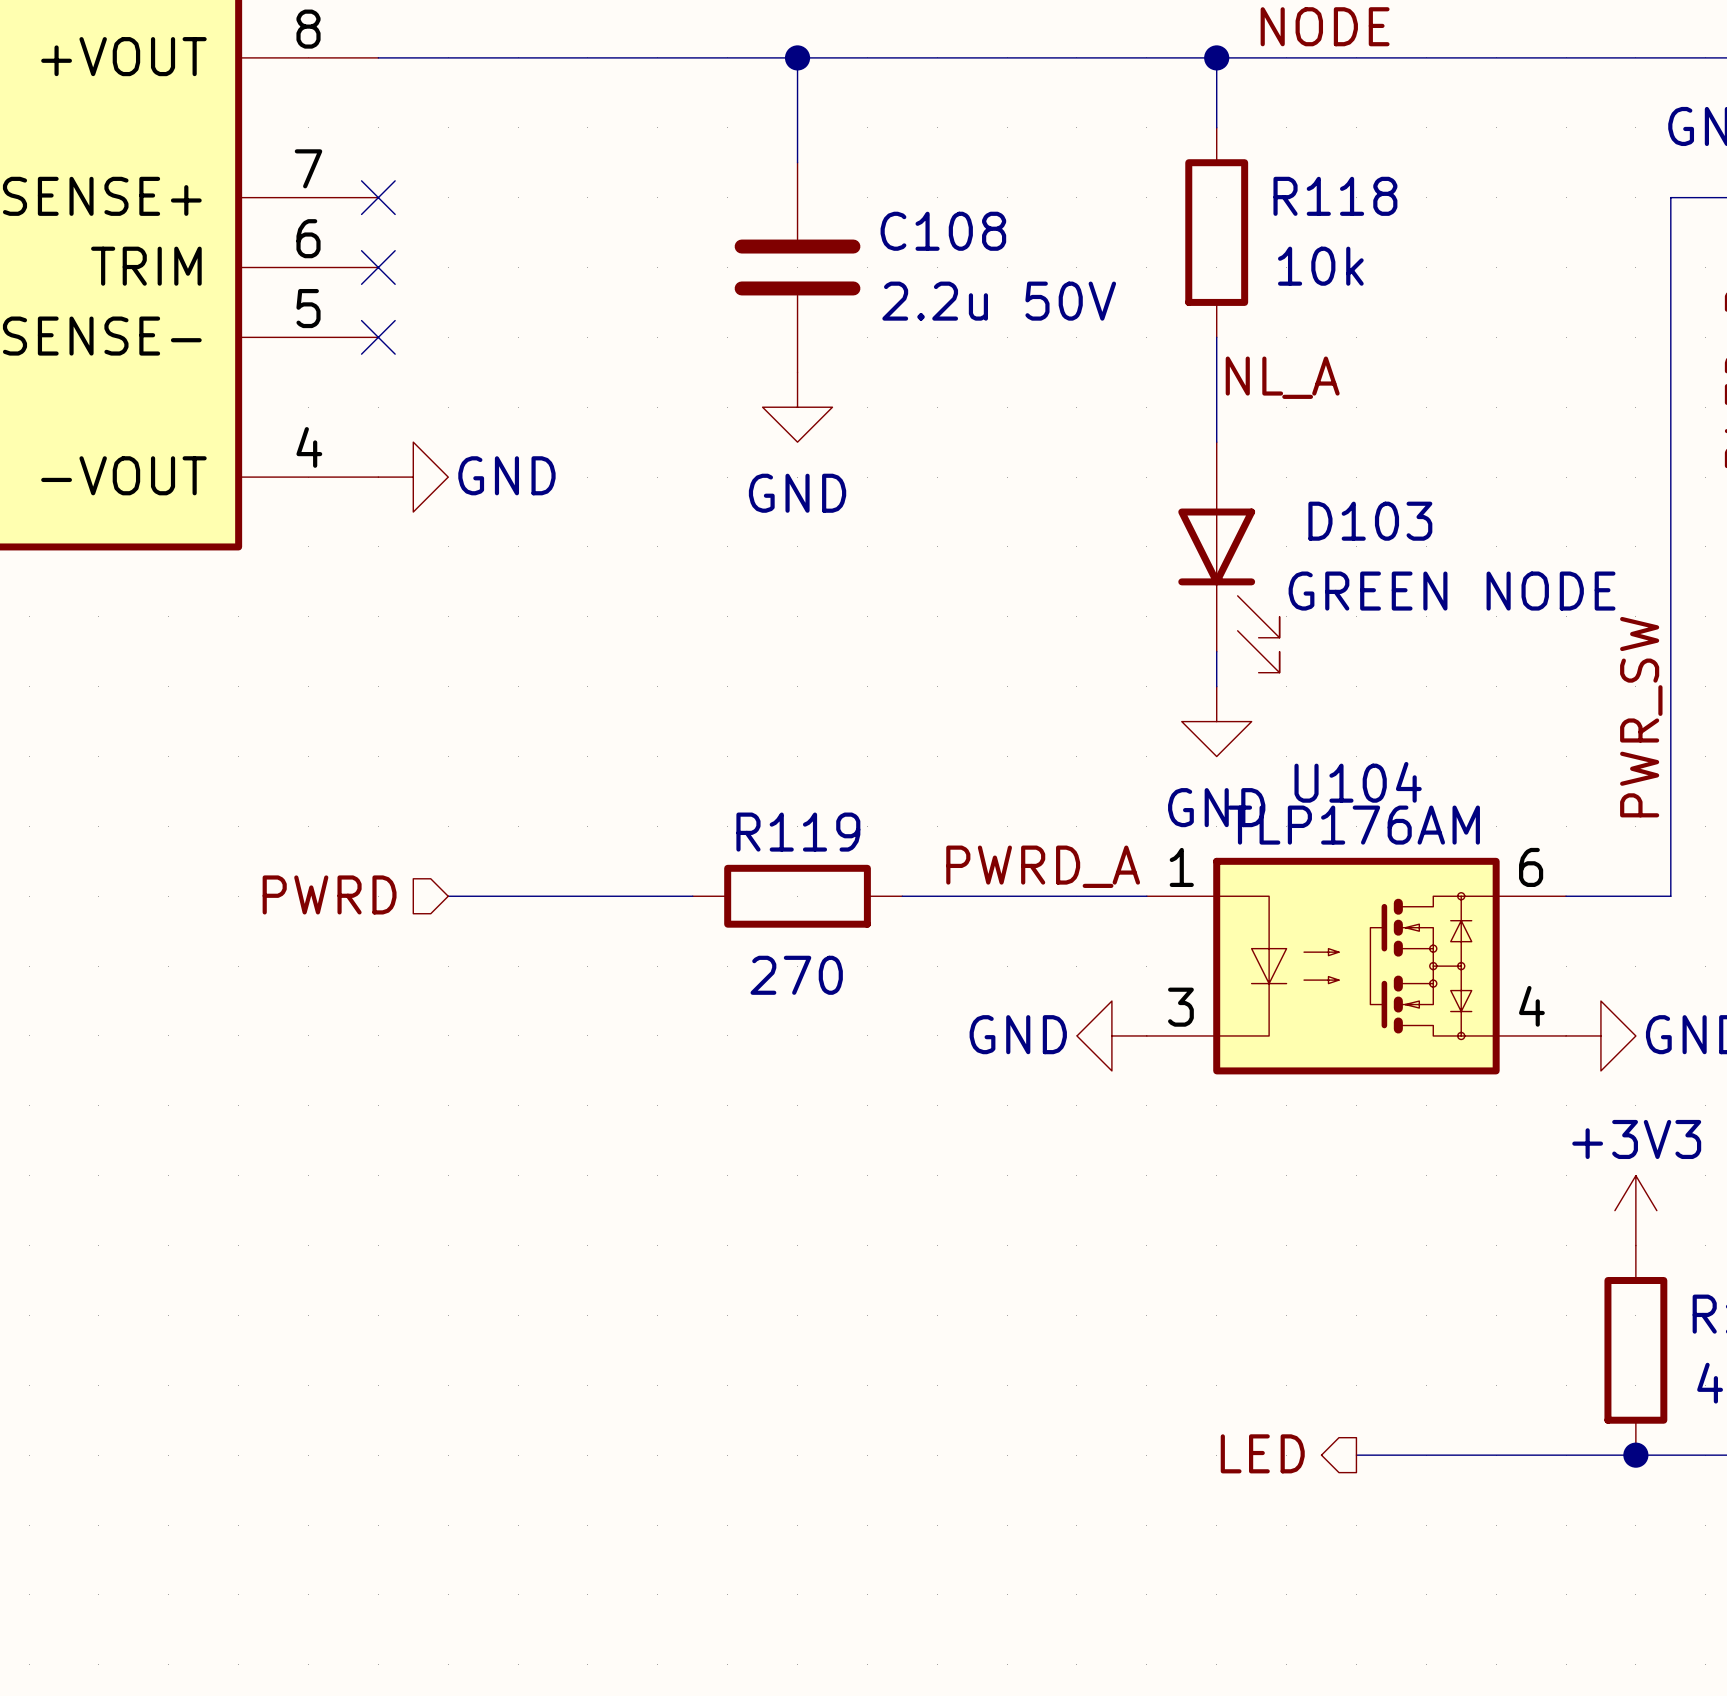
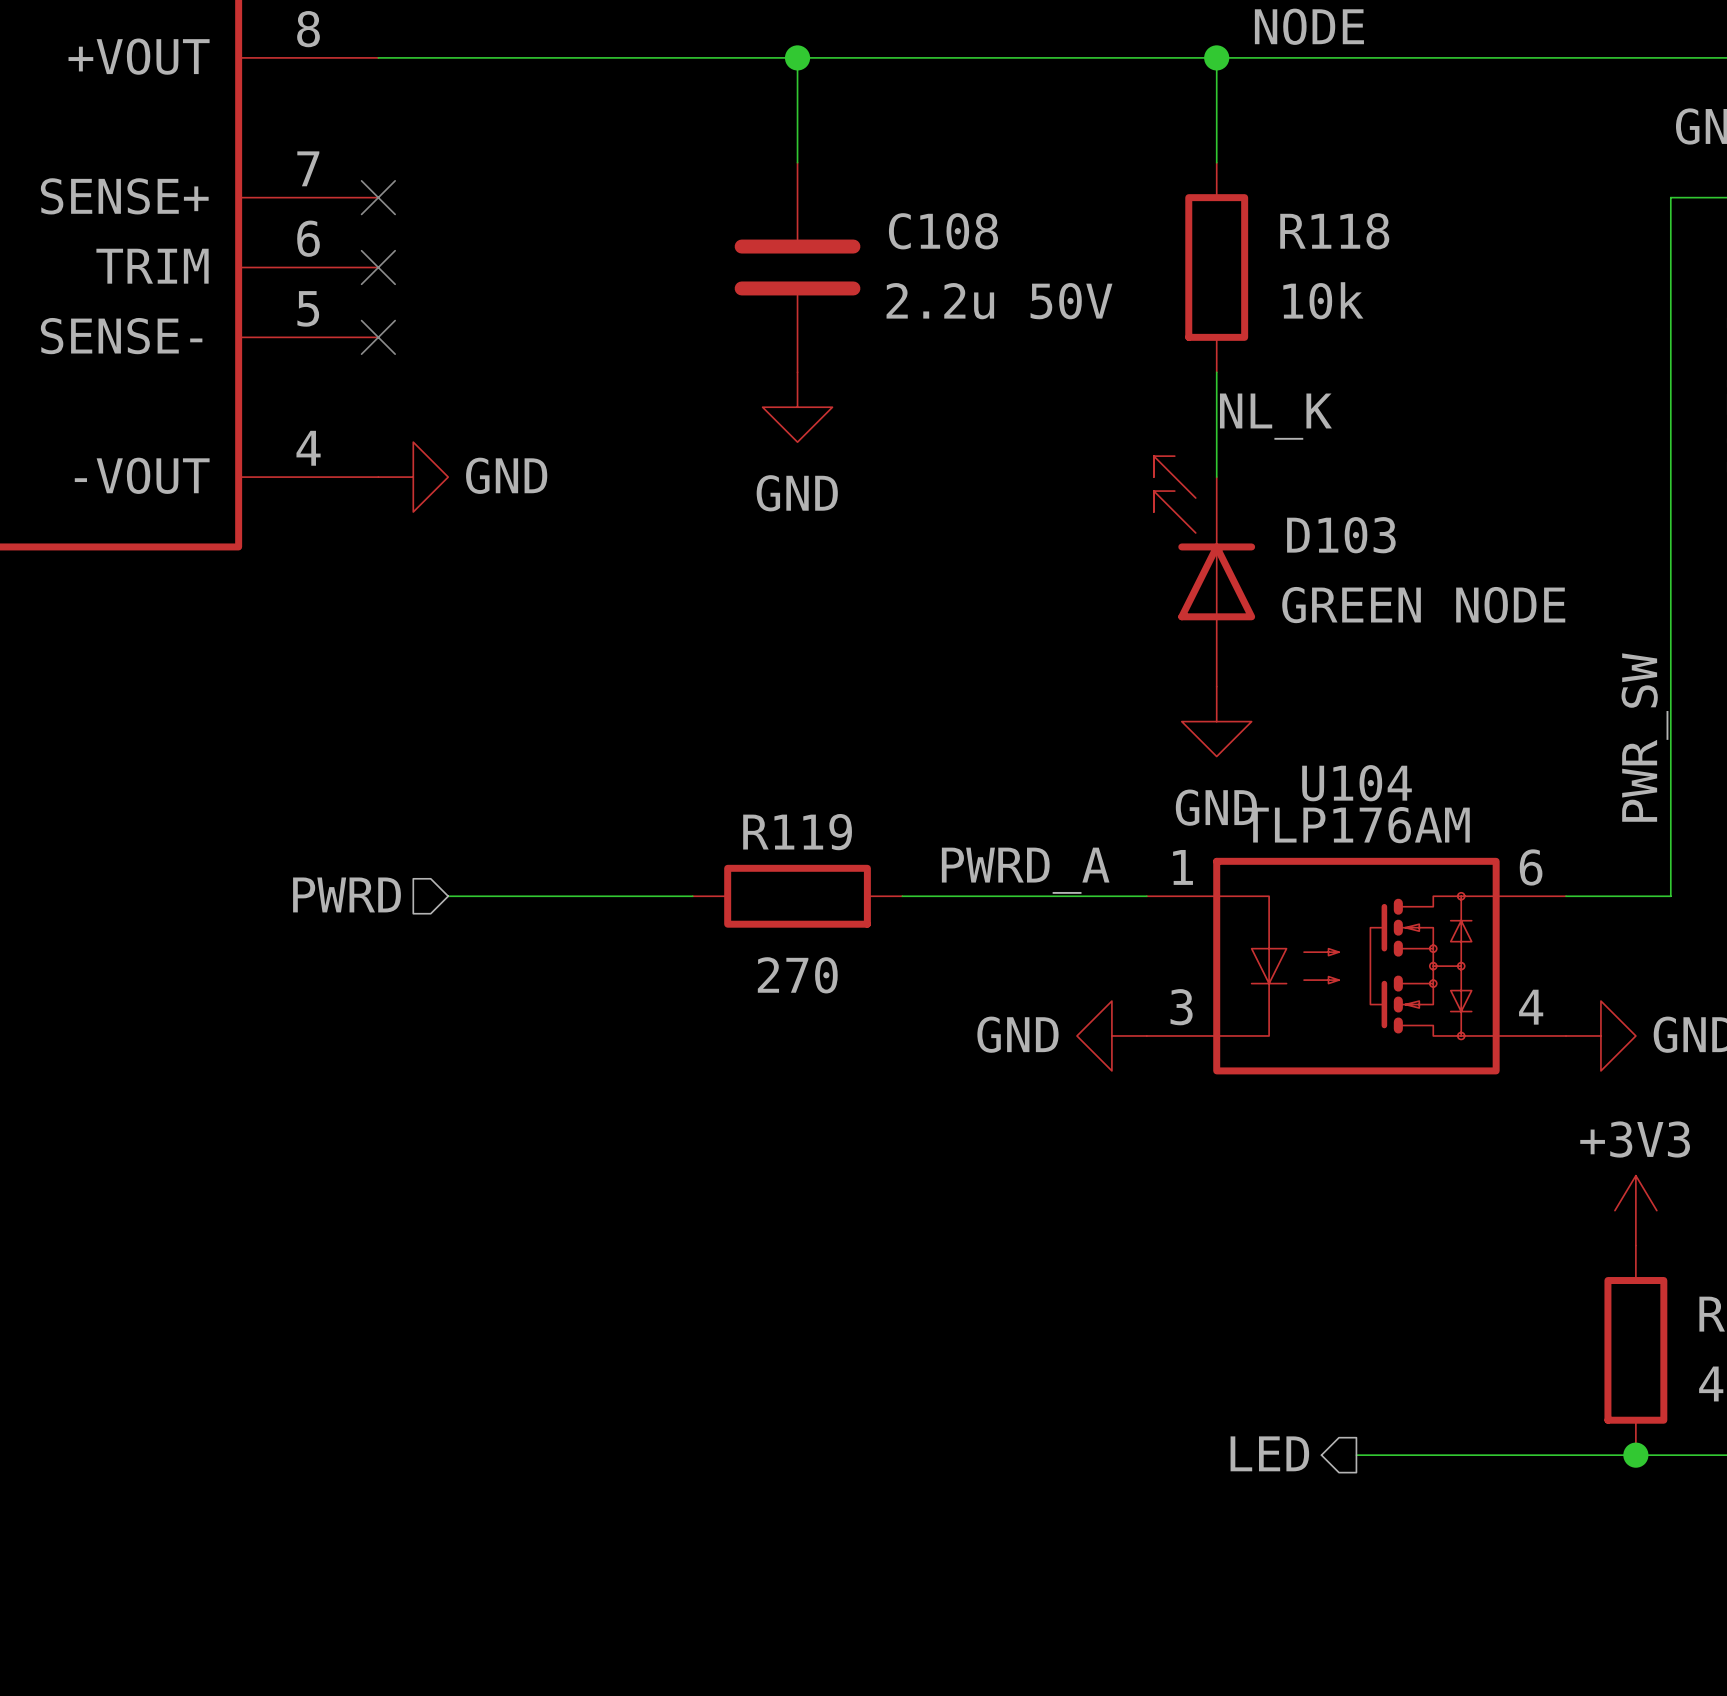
R118 position: (1216, 232) -> (1216, 267)
label: NL_A (1282, 377) -> NL_K (1275, 416)
D103 rotation: 0° (1228, 590) -> 180° (1204, 538)

